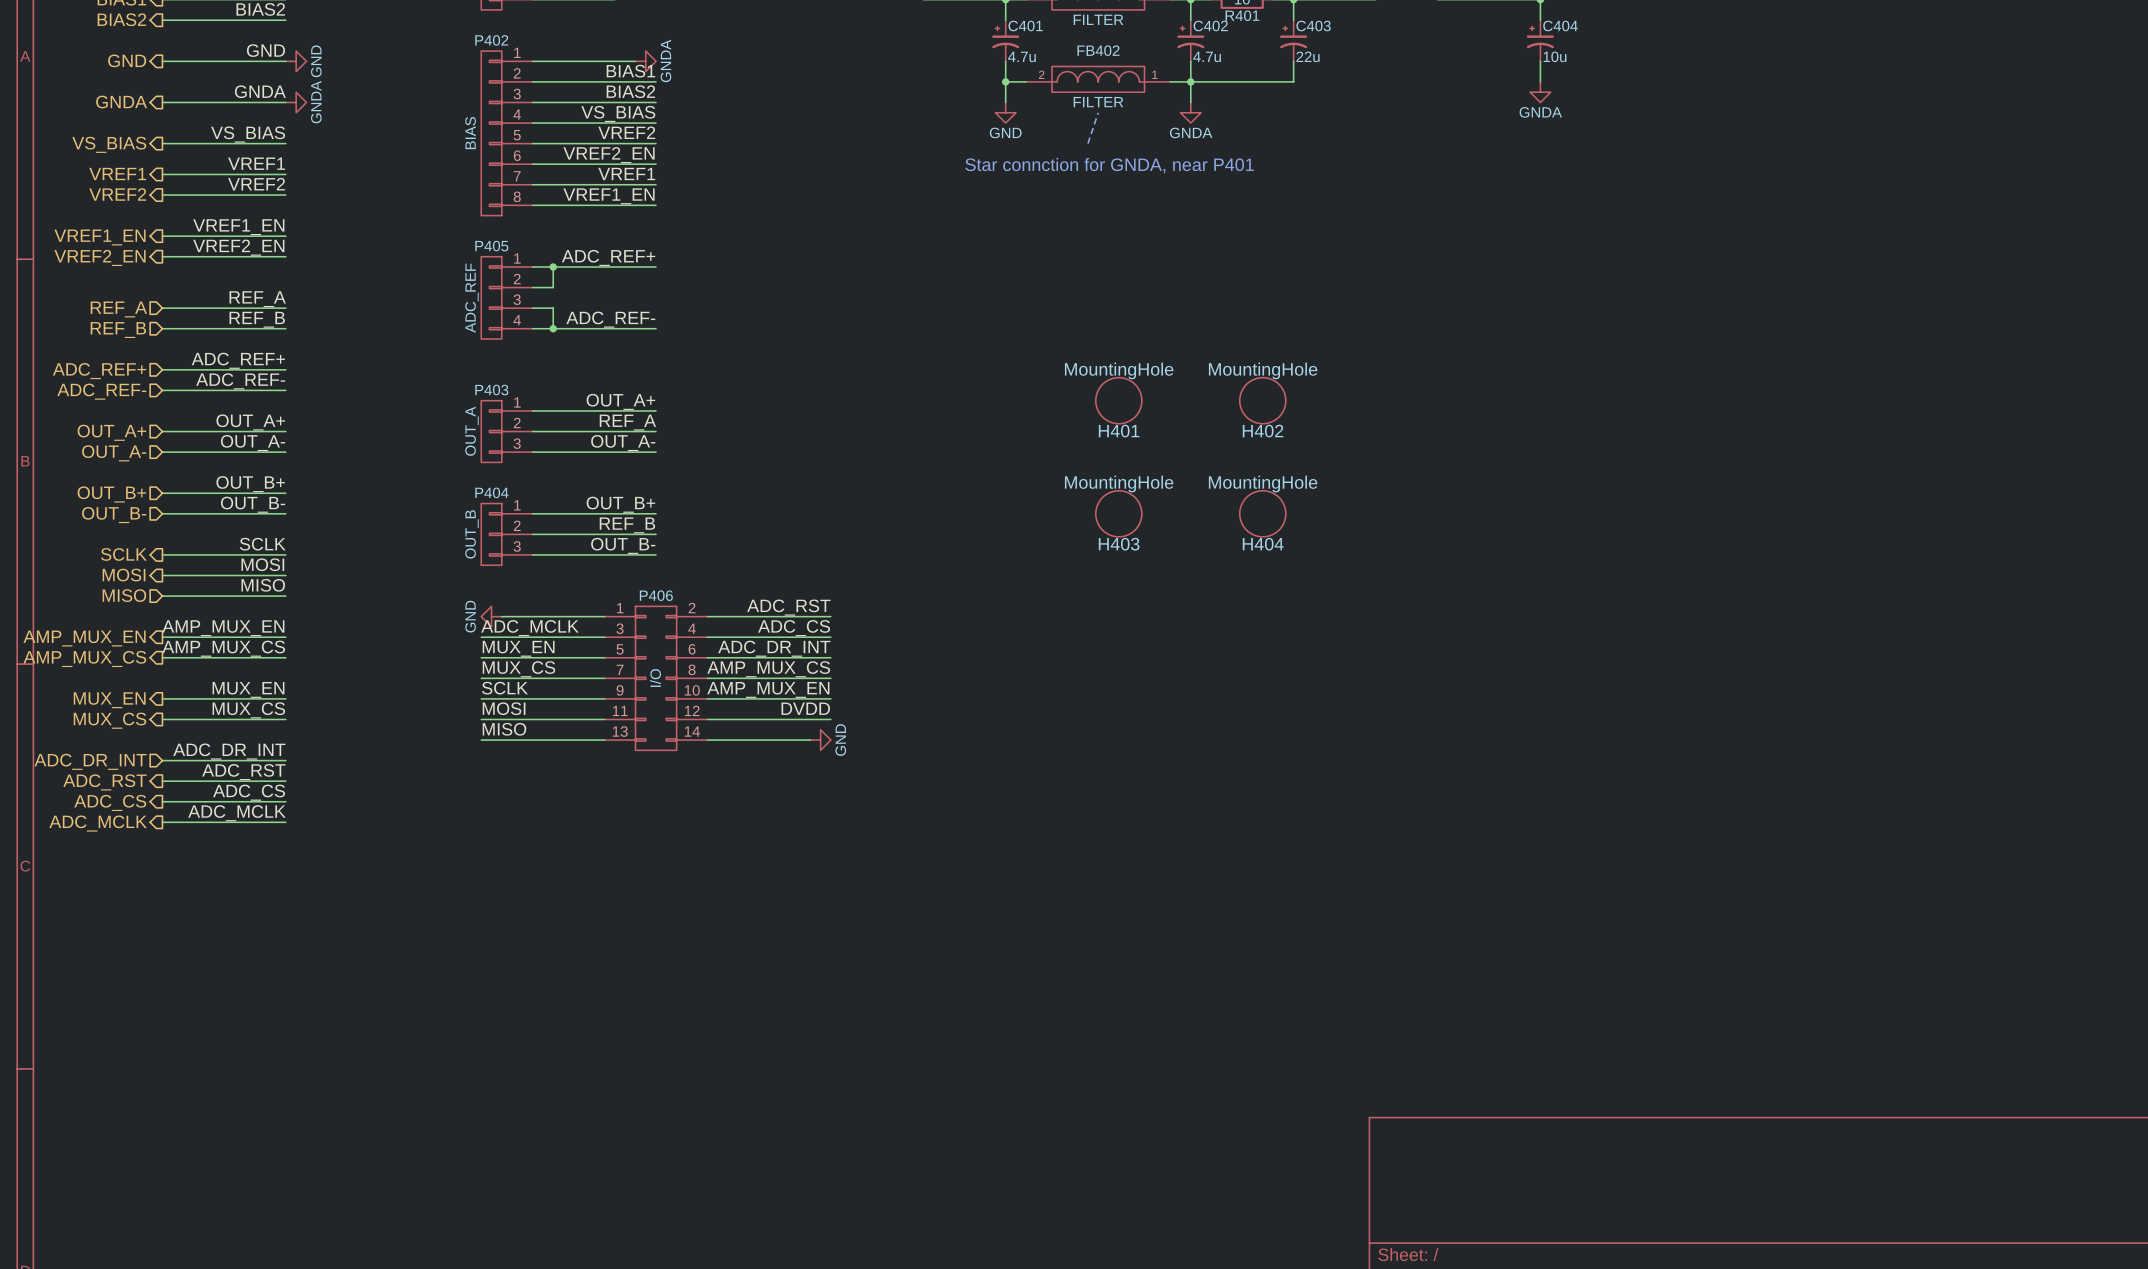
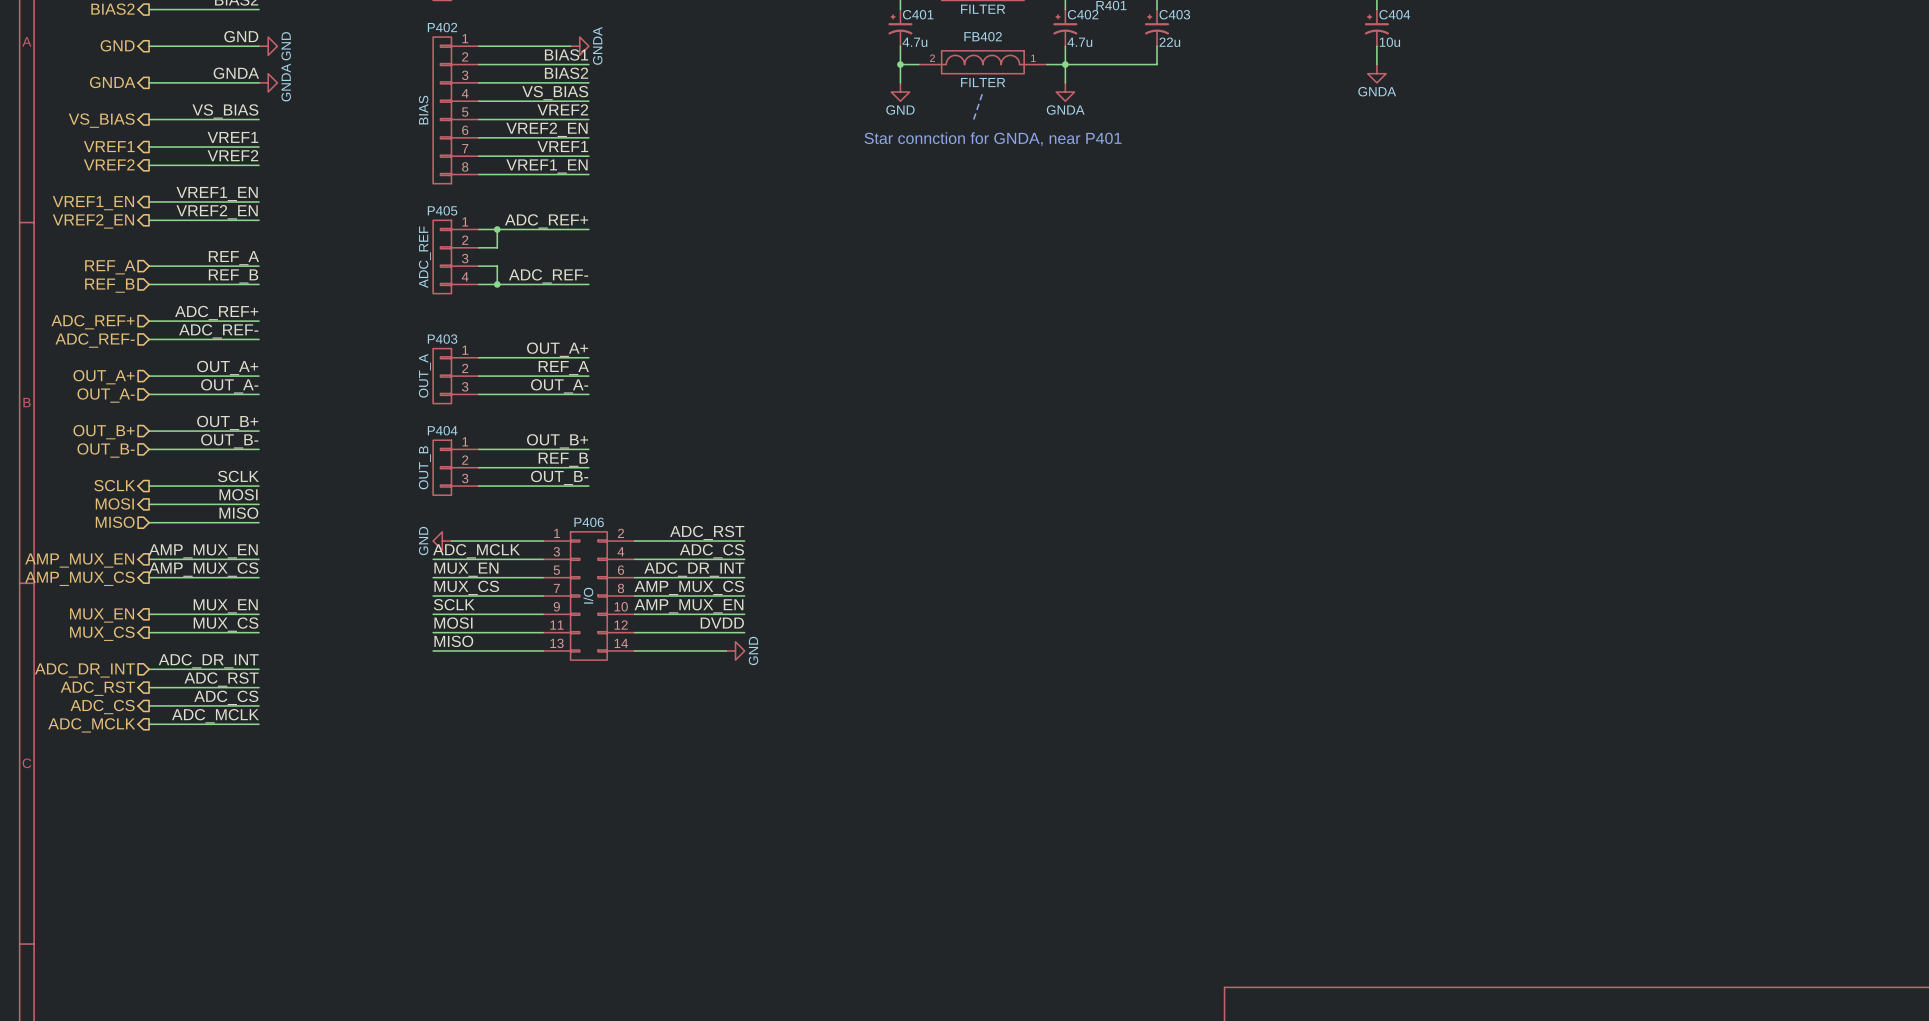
H401: MountingHole (1118, 400) -> none
H402: MountingHole (1262, 400) -> none
H403: MountingHole (1118, 513) -> none
H404: MountingHole (1262, 513) -> none

